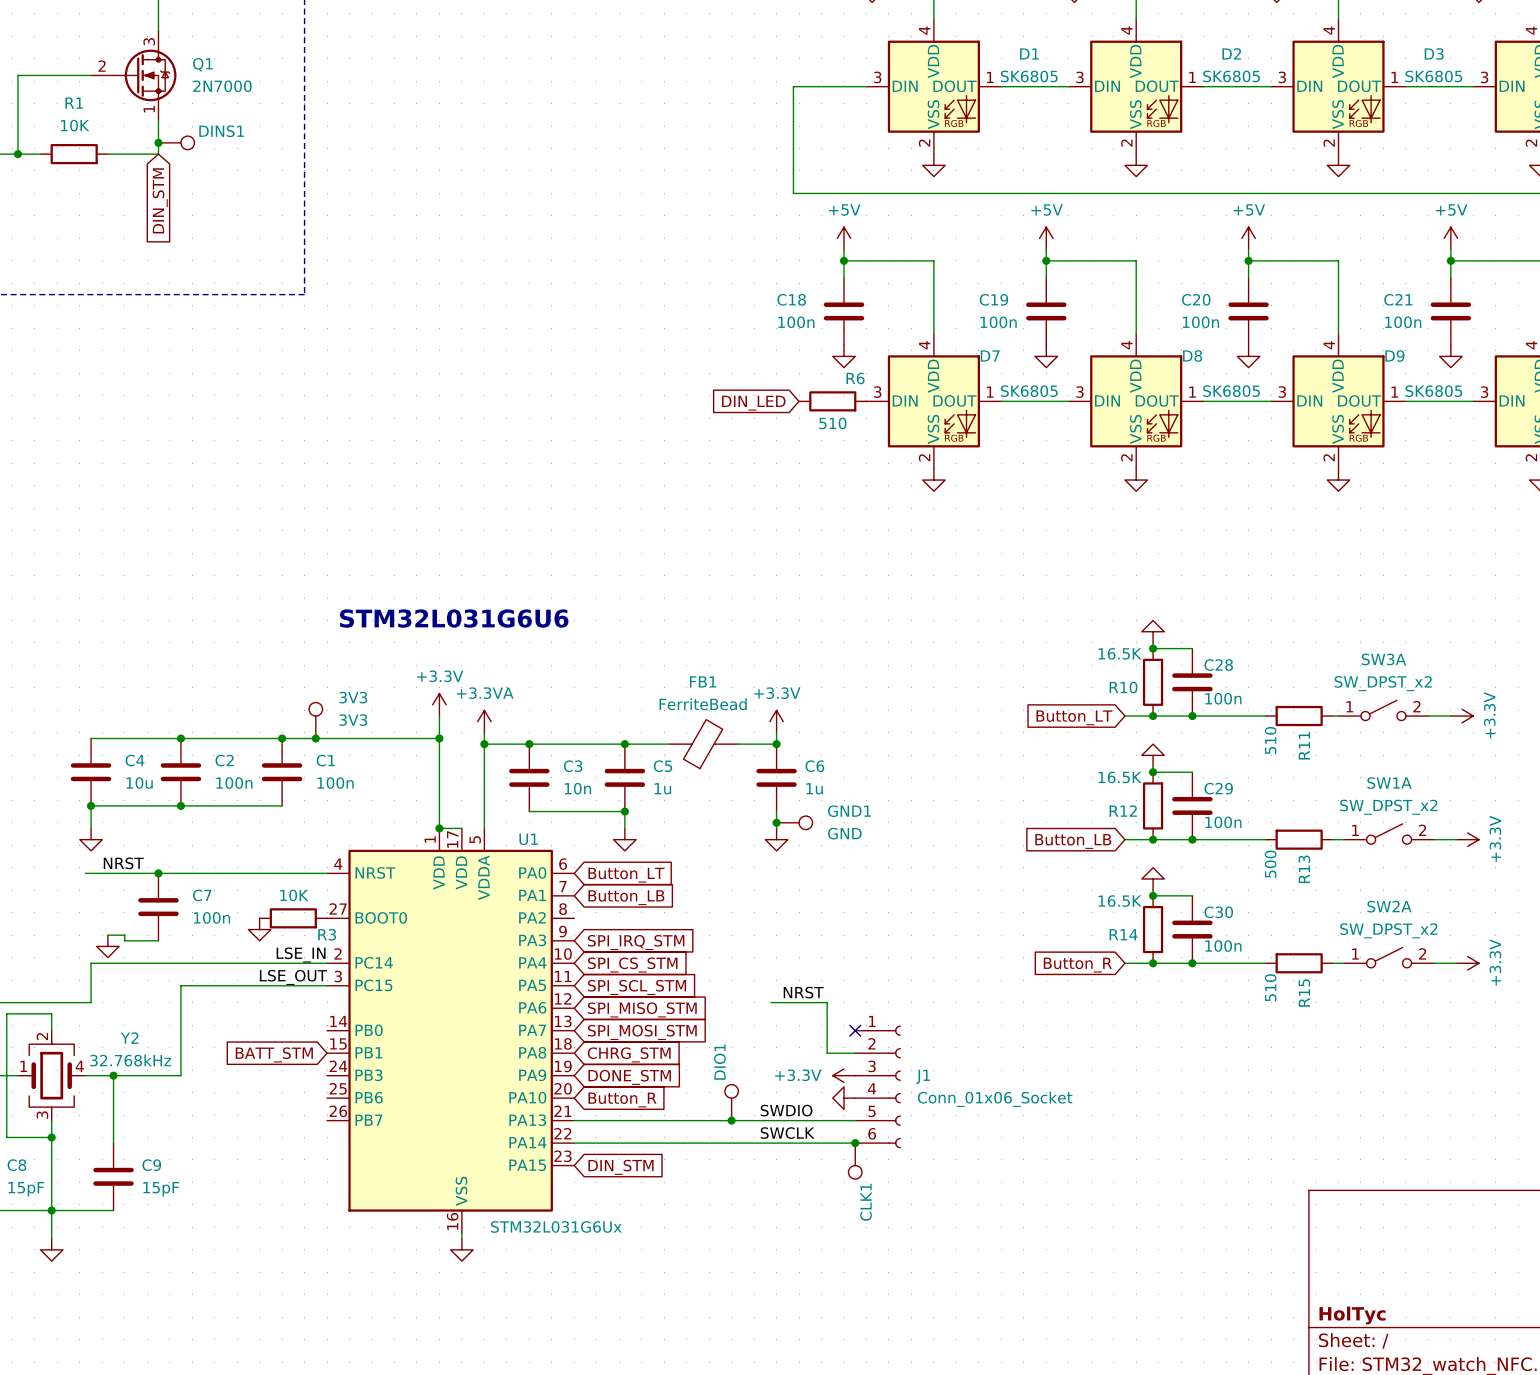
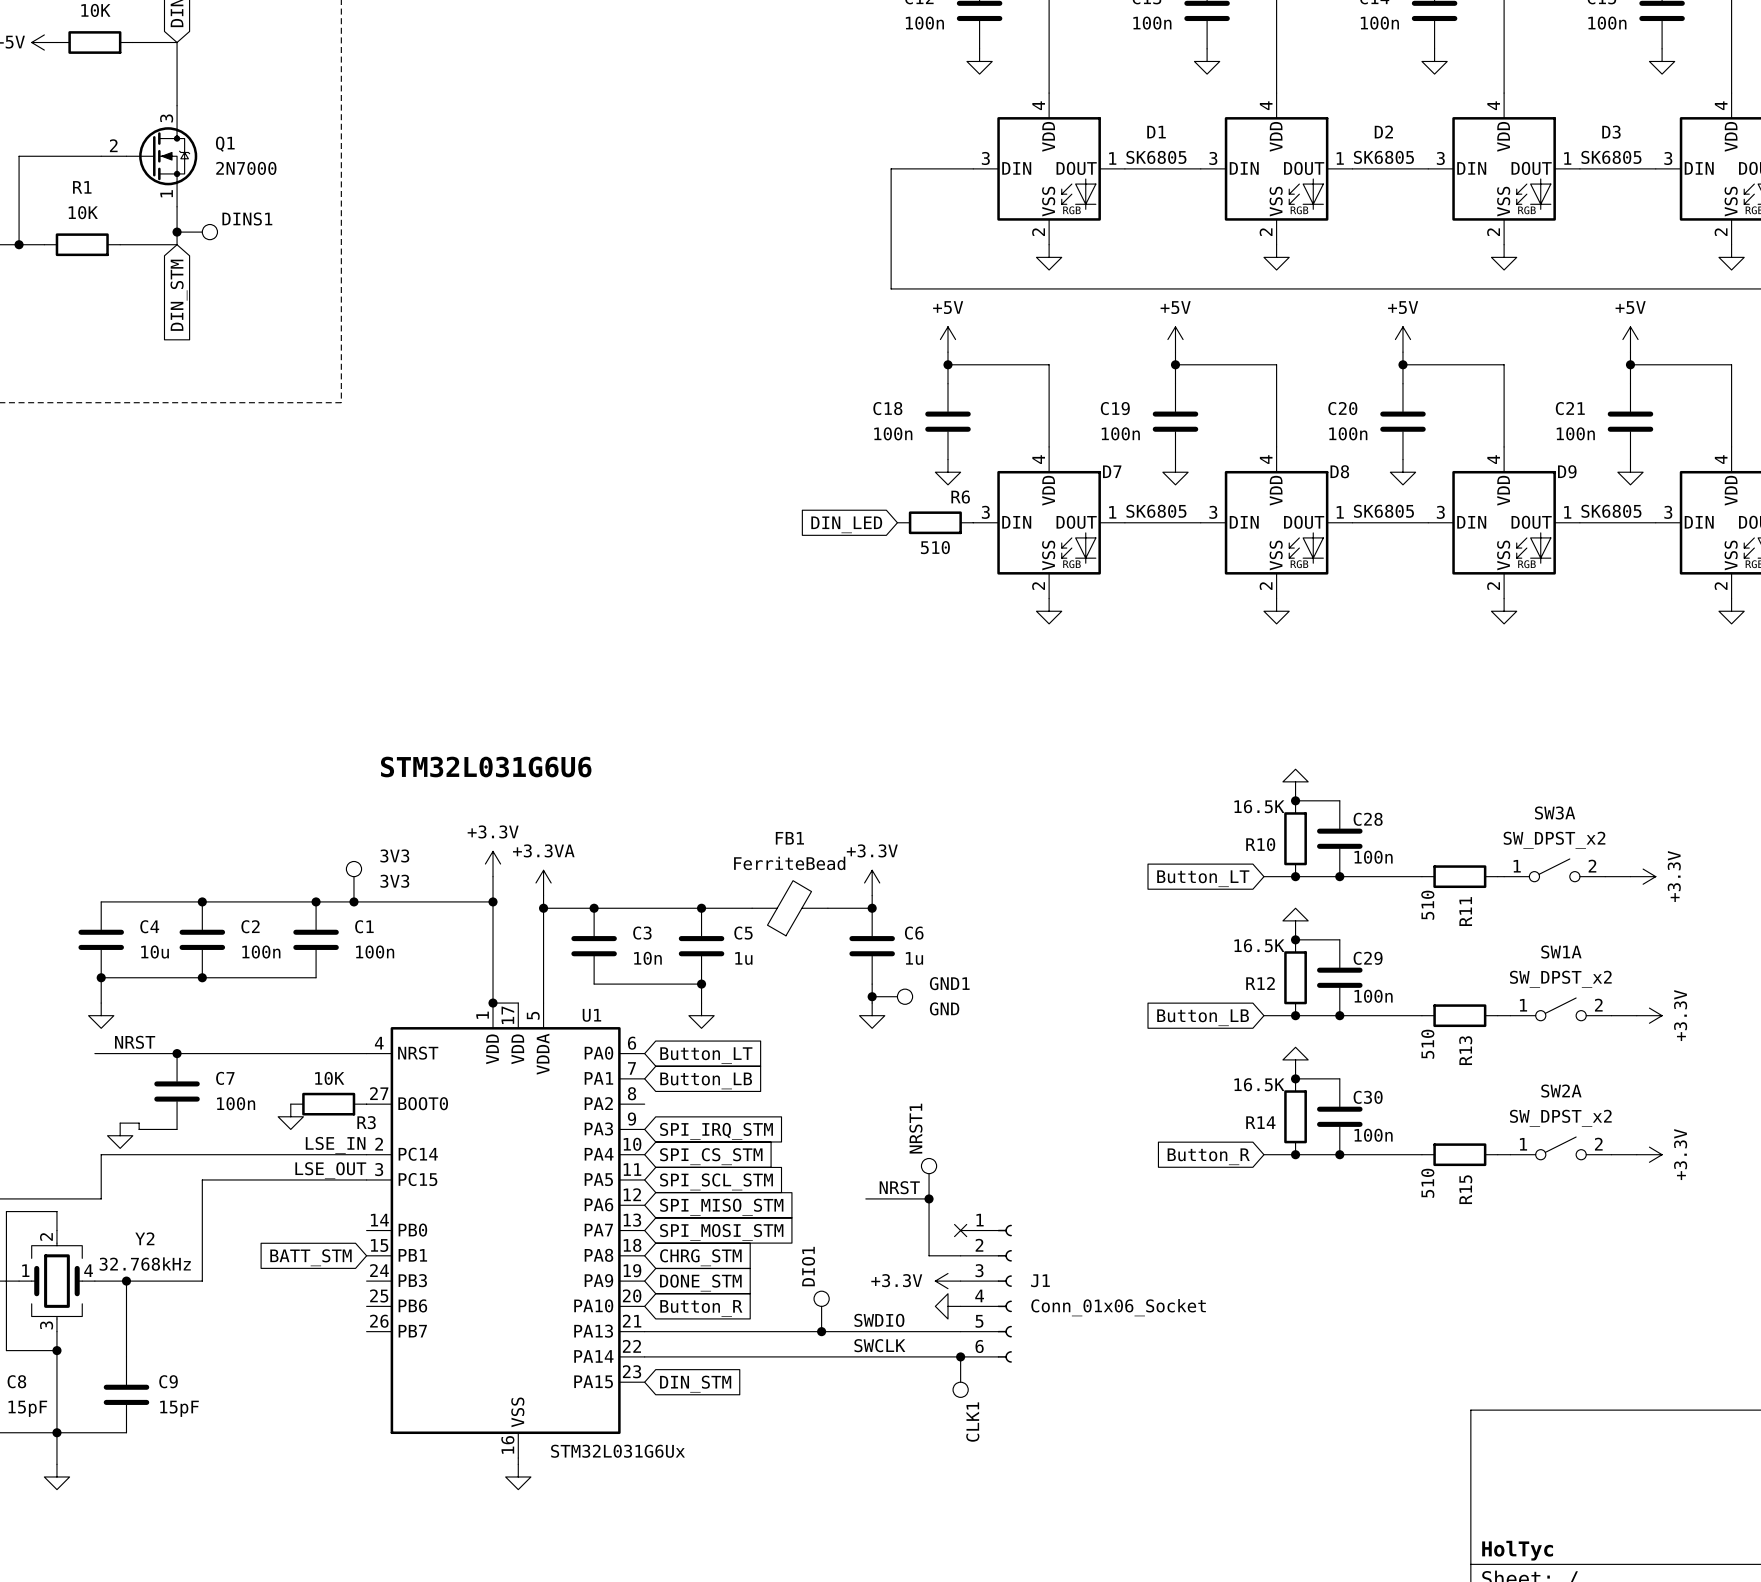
R13 value: 500 (1270, 864) -> 510 (1427, 1044)
NRST1: none -> (929, 1178)
junction: none -> (929, 1198)

